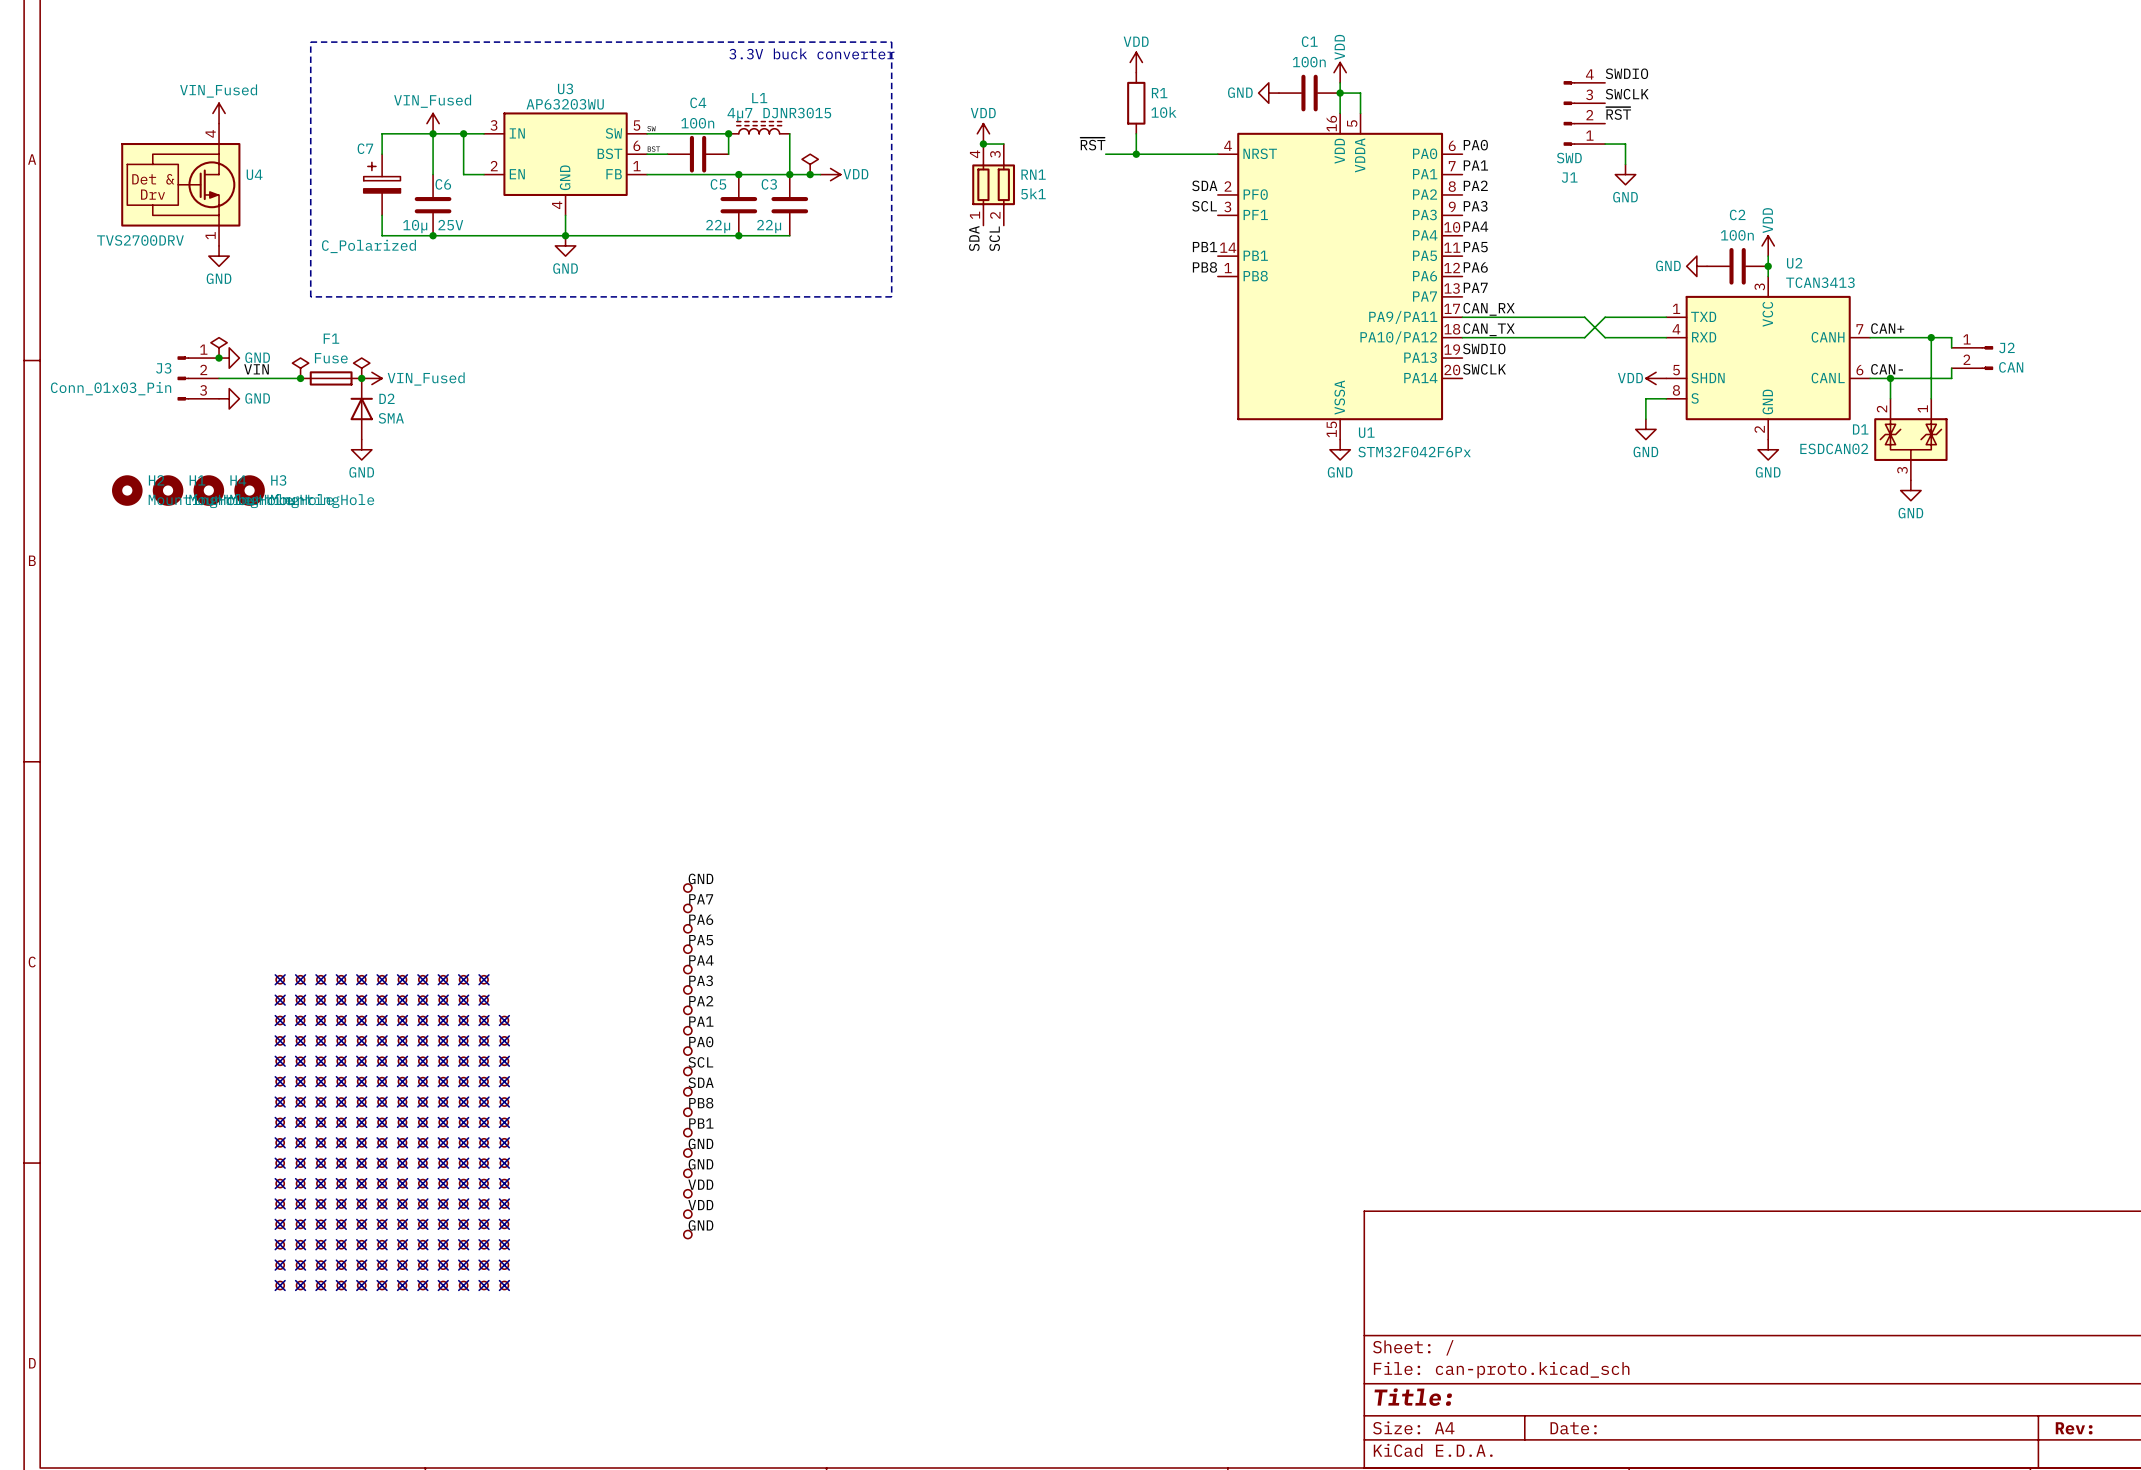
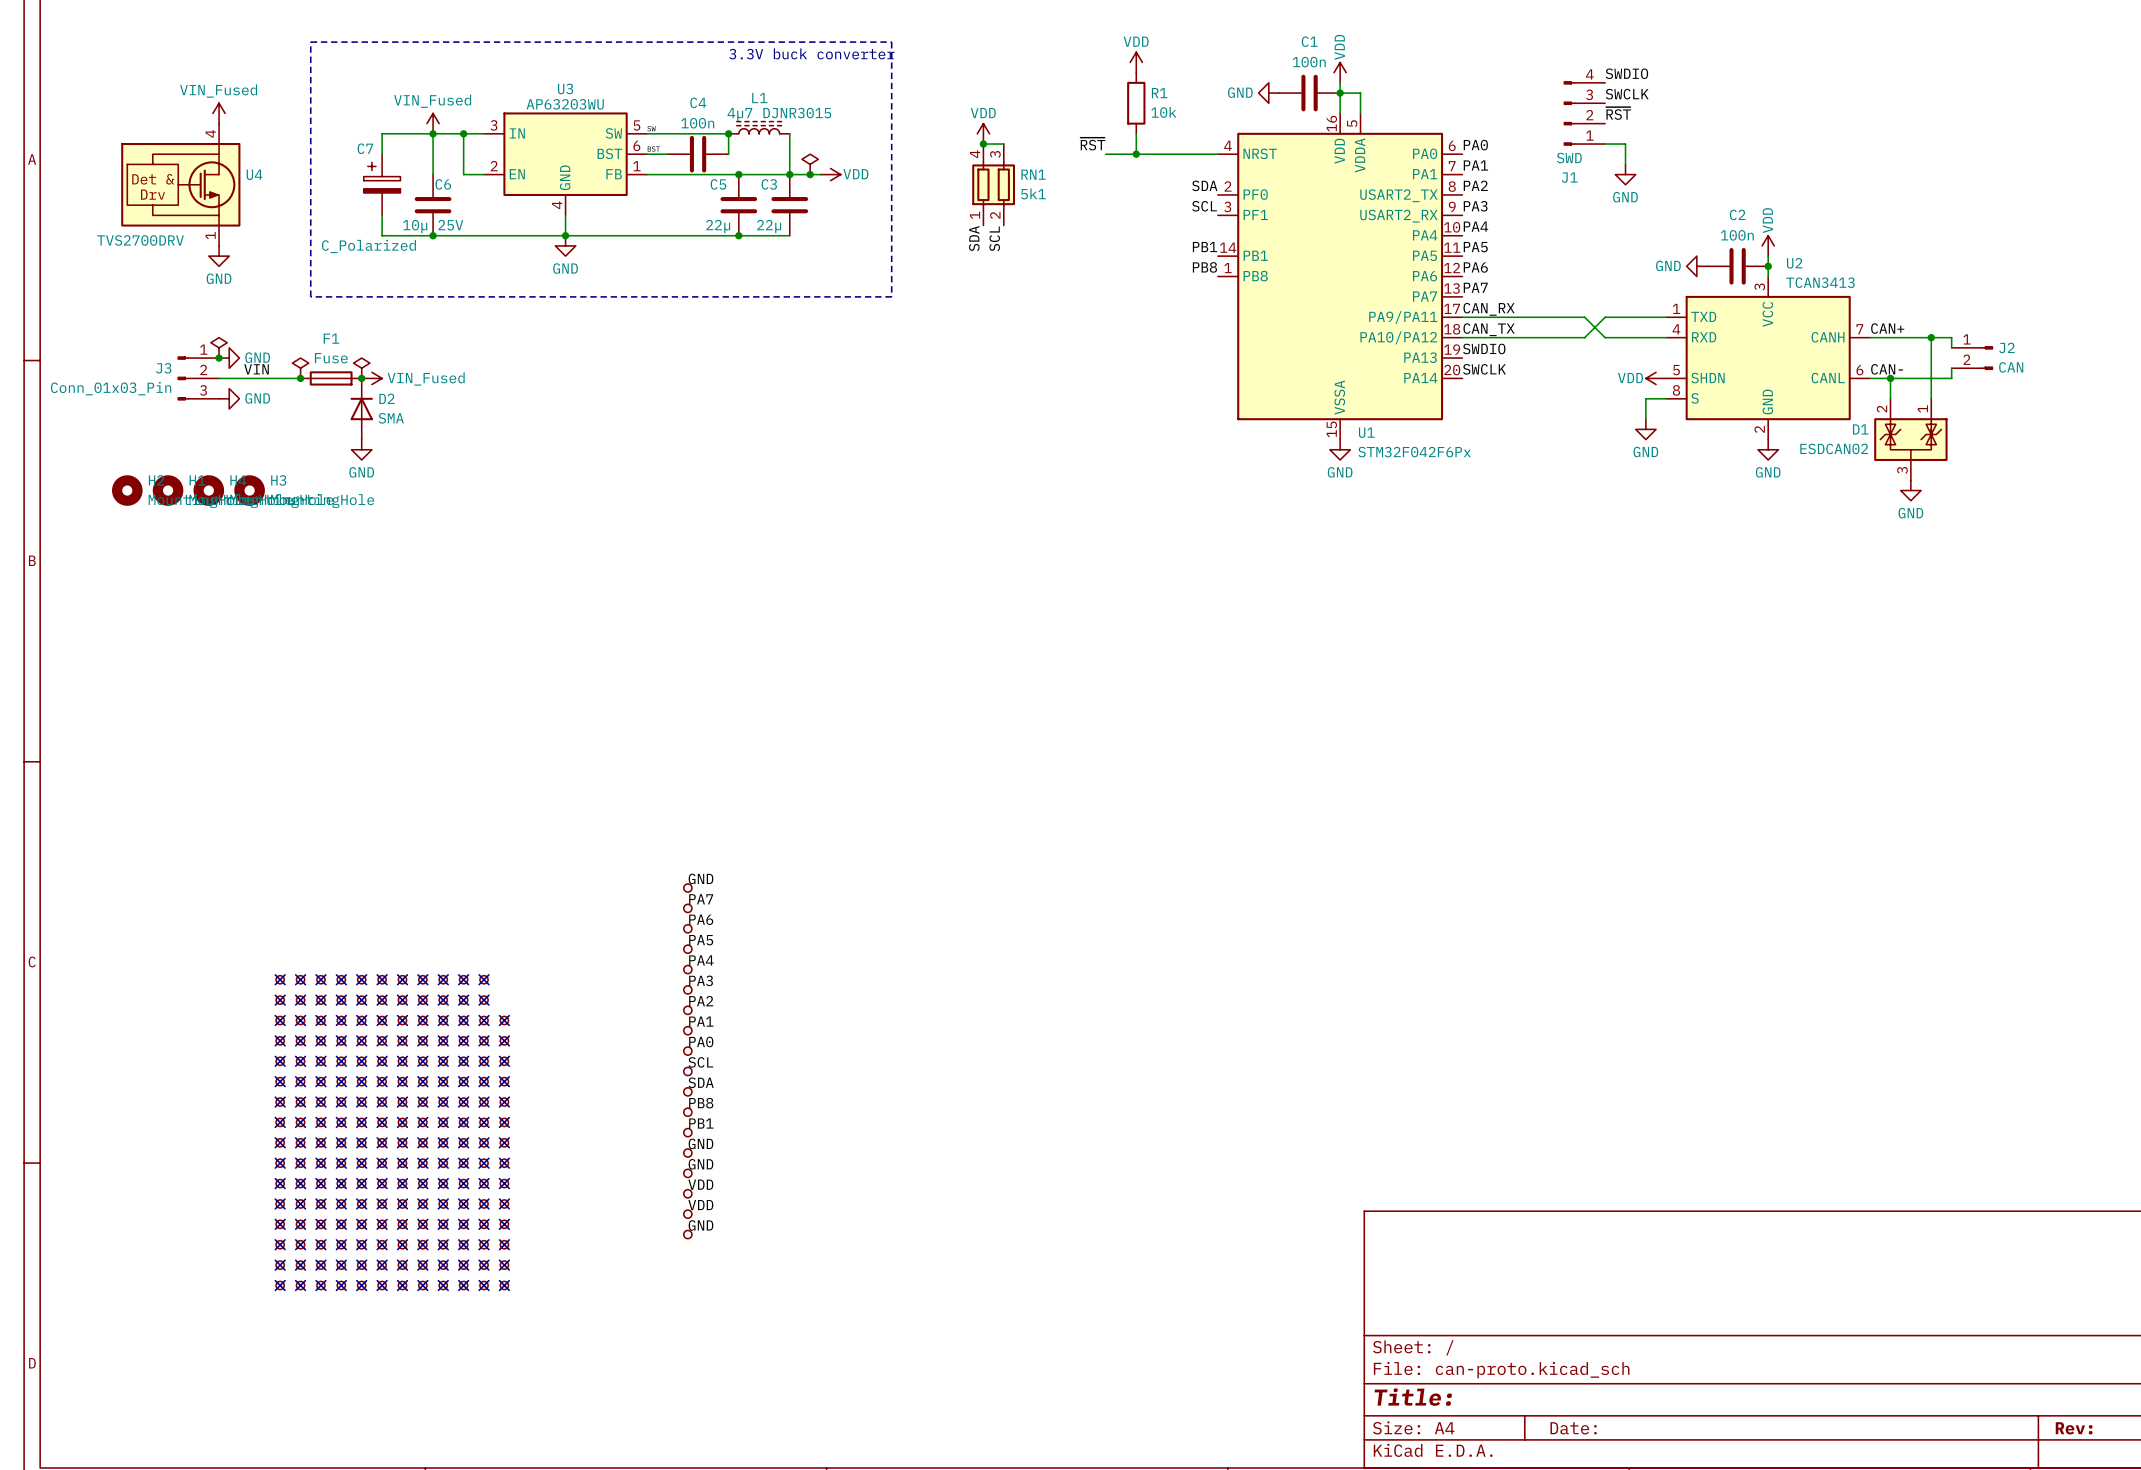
U1 pin name: PA2 (1425, 194) -> USART2_TX (1398, 195)
U1 pin name: PA3 (1424, 214) -> USART2_RX (1398, 216)

